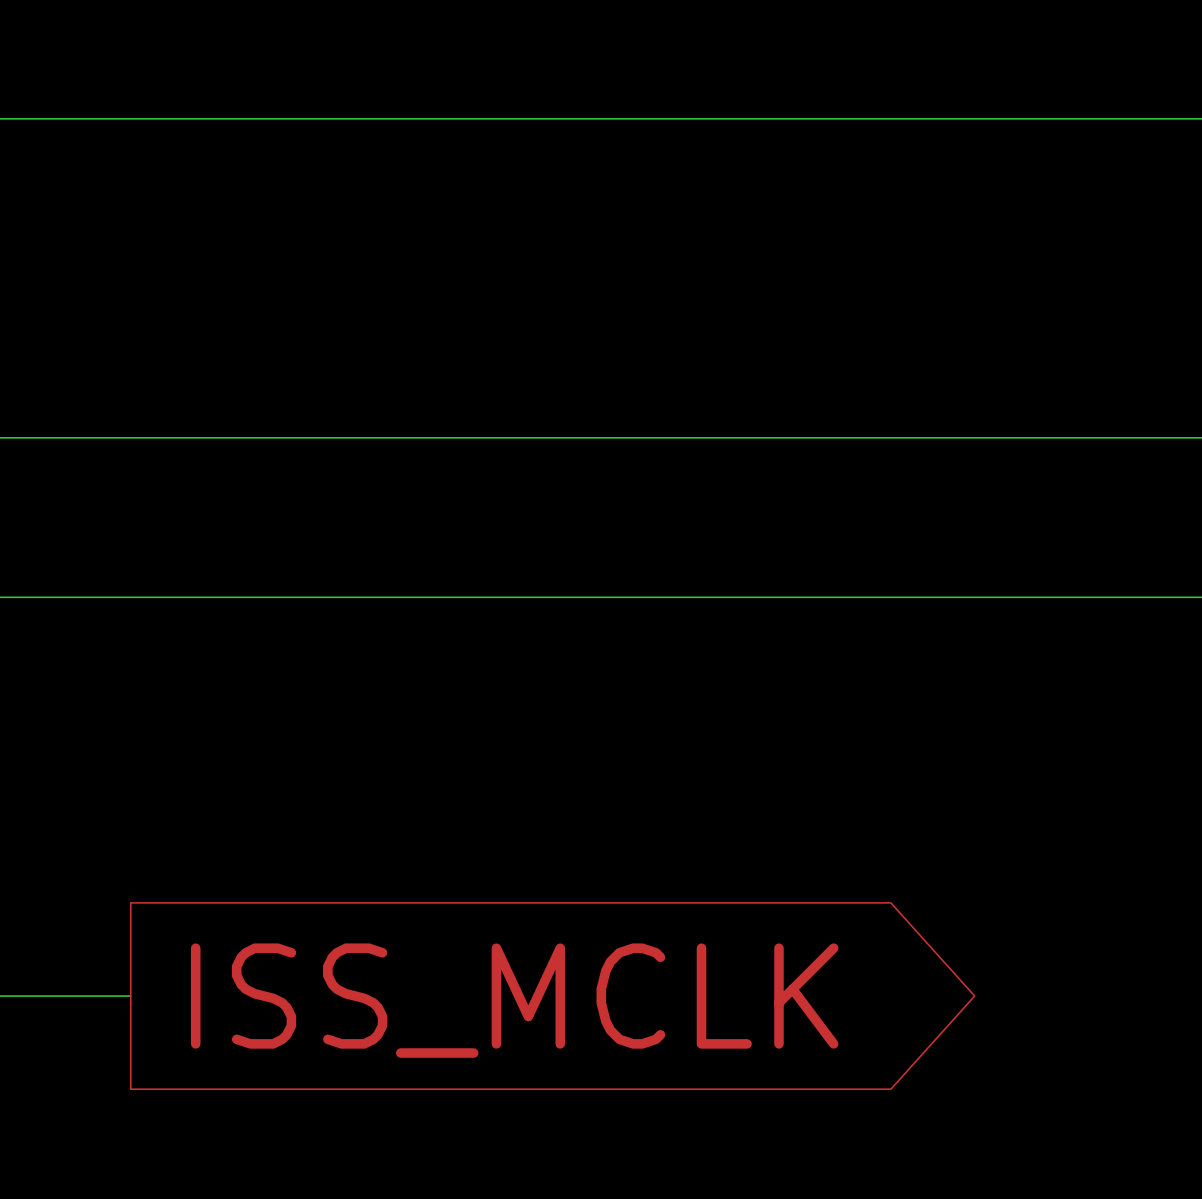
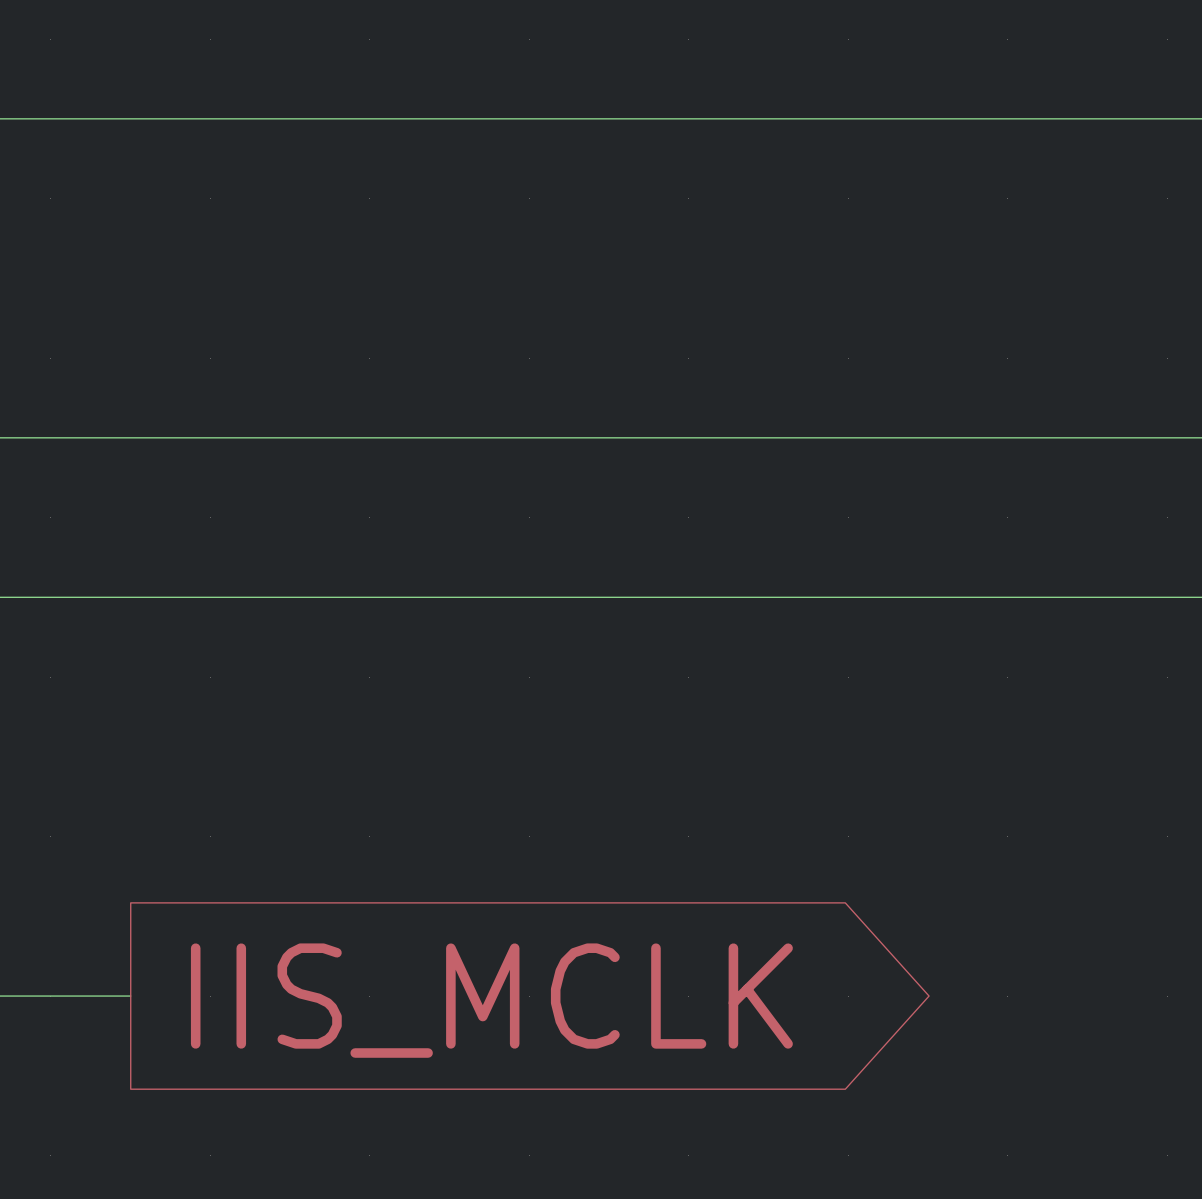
global label: ISS_MCLK (514, 1000) -> IIS_MCLK (491, 1000)

